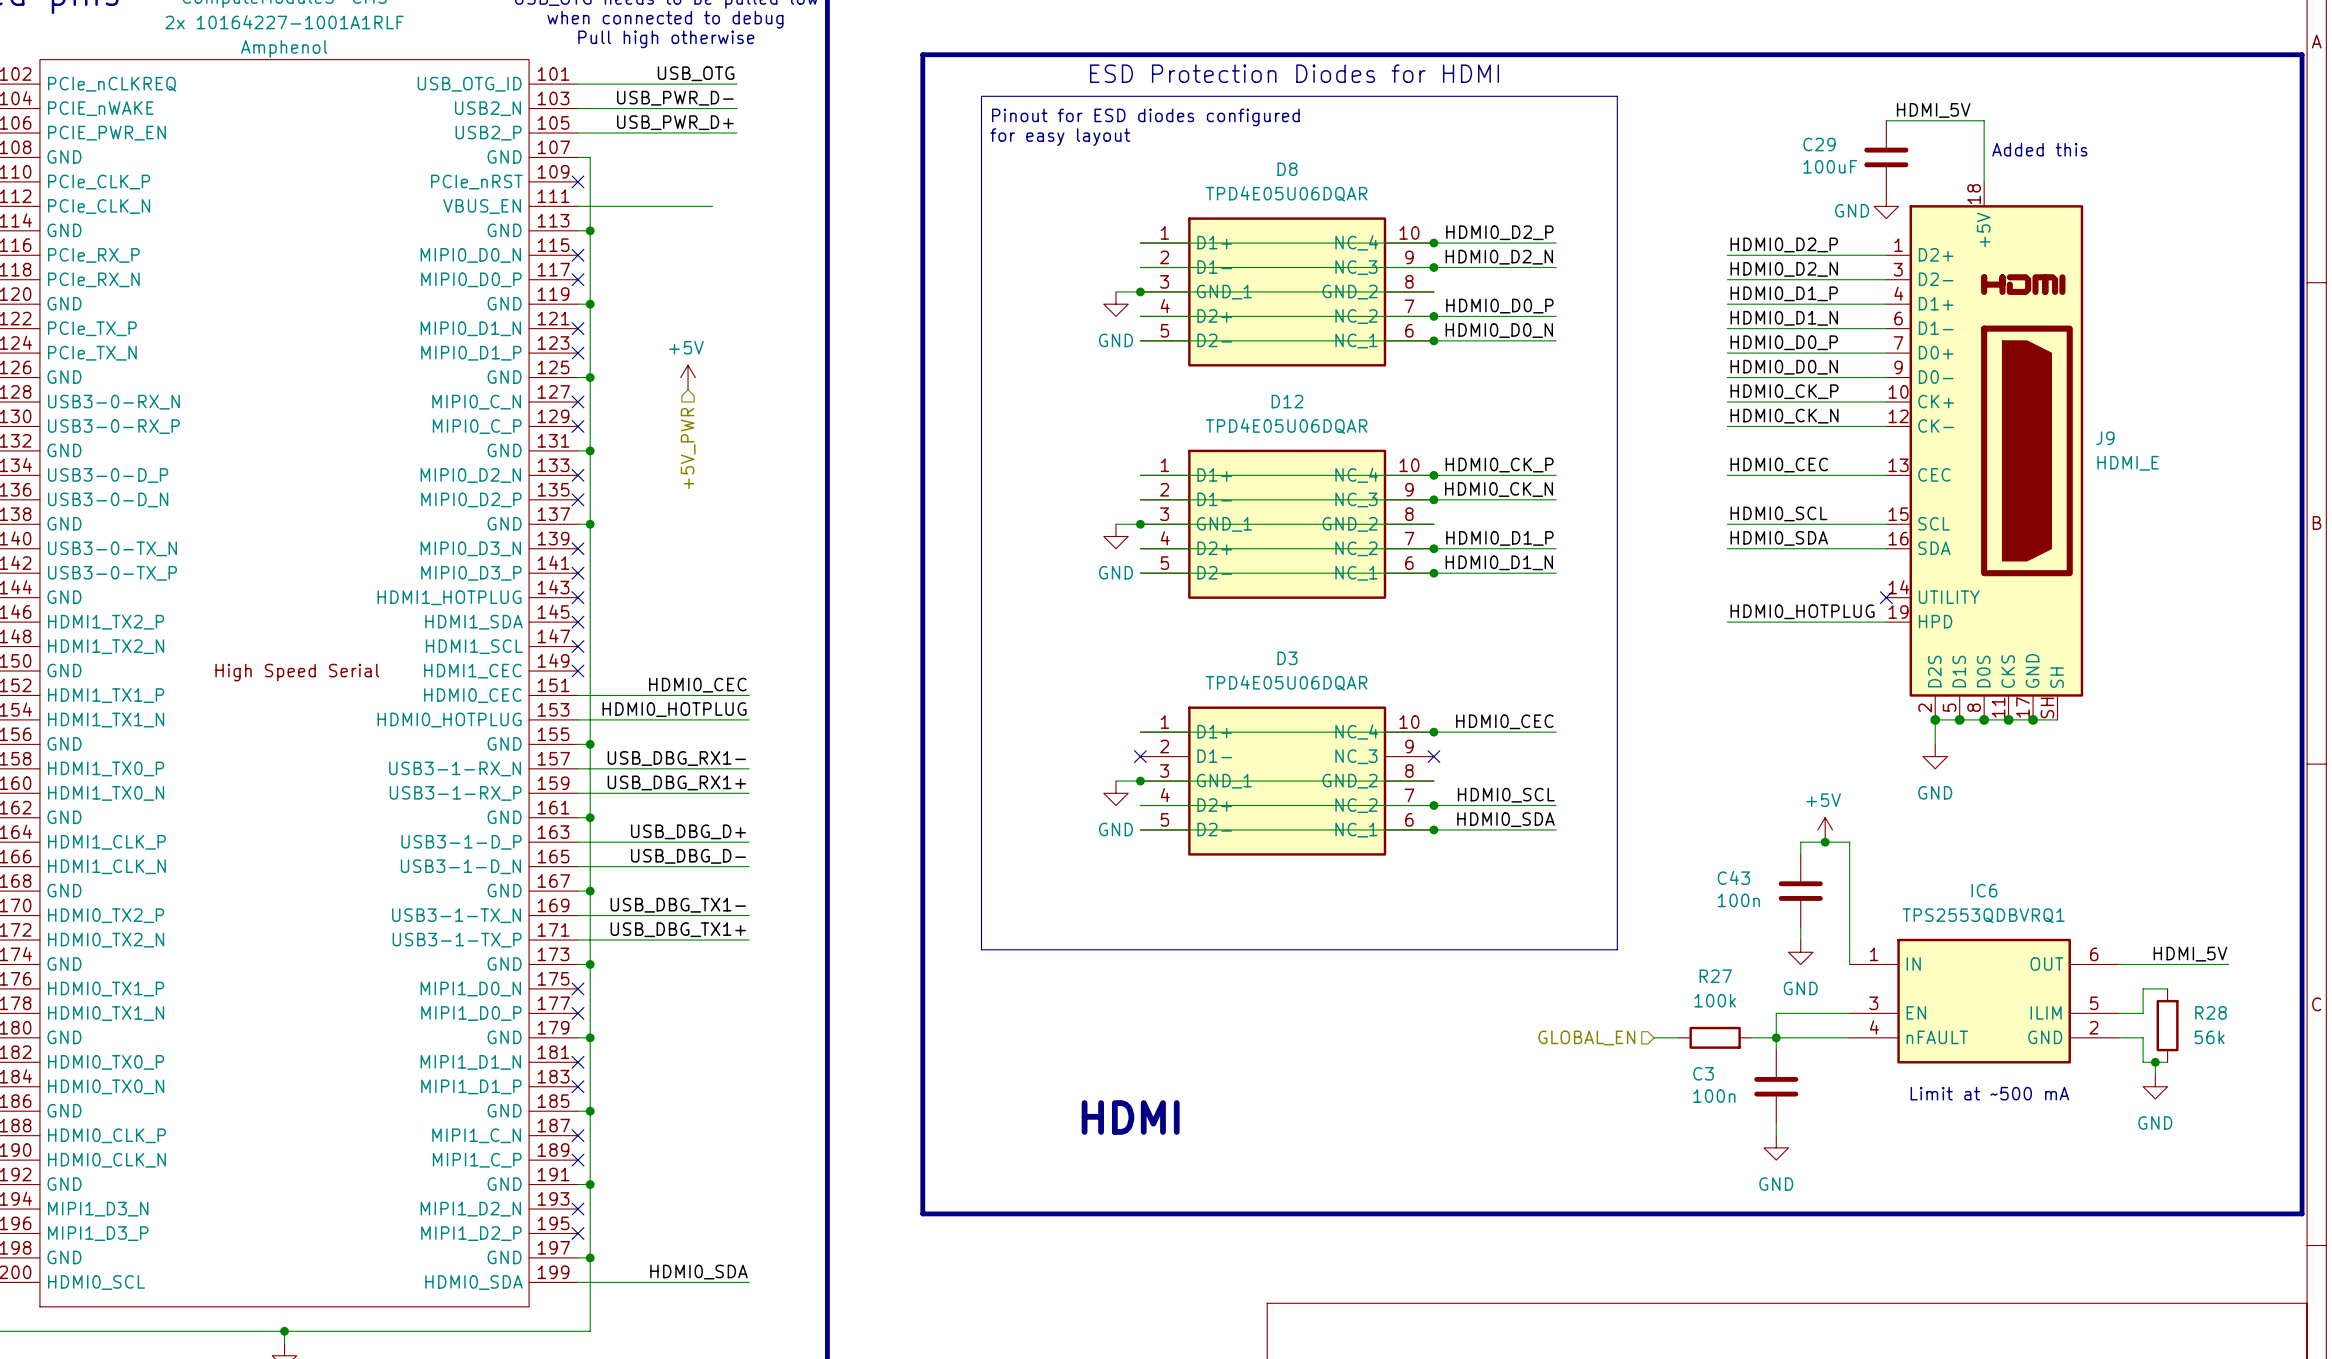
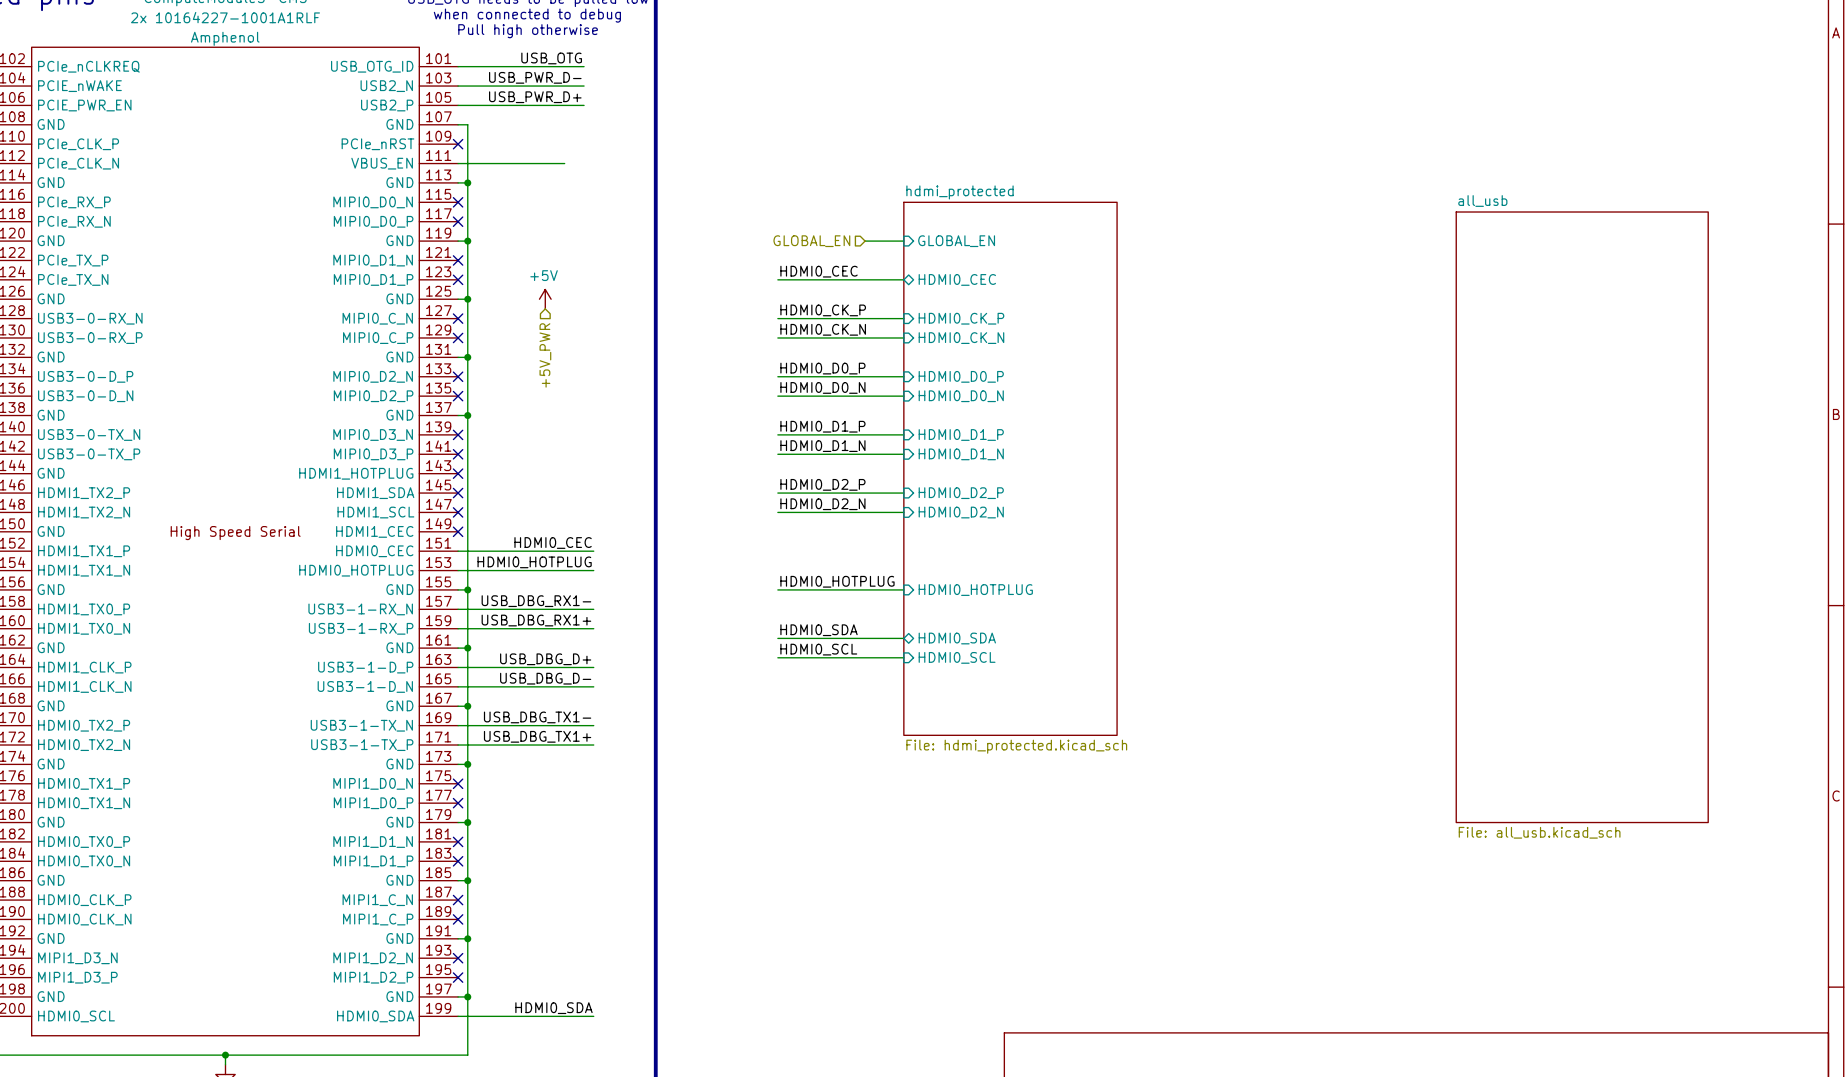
line: (922, 54) (2302, 54) (2302, 1213) (922, 1213) (922, 54) -> none
text: ESD Protection Diodes for HDMI (1294, 73) -> none
line: (981, 96) (1617, 96) (1617, 949) (981, 949) (981, 96) -> none
label: HDMI_5V (1933, 110) -> none
text: Pinout for ESD diodes configured (1145, 117) -> none
wire: (1886, 120) (1984, 120) (1984, 181) -> none
text: for easy layout (1060, 137) -> none
text: Added this (2039, 149) -> none
C29: 100uF (1886, 157) -> none
power symbol: GND (1886, 206) -> none
label: HDMI0_D2_P (1499, 232) -> none
wire: (1140, 243) (1556, 243) -> none
junction: (1433, 243) -> none
label: HDMI0_D2_P (1784, 244) -> none
wire: (1727, 255) (1886, 255) -> none
label: HDMI0_D2_N (1499, 257) -> none
wire: (1140, 267) (1556, 267) -> none
junction: (1433, 267) -> none
label: HDMI0_D2_N (1784, 269) -> none
wire: (1727, 279) (1886, 279) -> none
wire: (1115, 291) (1433, 291) -> none
junction: (1140, 291) -> none
D8: TPD4E05U06DQAR (1287, 291) -> none
label: HDMI0_D1_P (1784, 293) -> none
hierarchical label: none -> GLOBAL_EN (811, 241)
wire: none -> (865, 241) (903, 241)
power symbol: GND (1115, 304) -> none
sheet pin: none -> GLOBAL_EN (956, 241)
wire: (1727, 304) (1886, 304) -> none
label: HDMI0_D0_P (1499, 306) -> none
wire: (1140, 316) (1556, 316) -> none
junction: (1433, 316) -> none
label: HDMI0_D1_N (1784, 318) -> none
wire: (1727, 328) (1886, 328) -> none
label: HDMI0_D0_N (1499, 330) -> none
wire: (1140, 340) (1556, 340) -> none
junction: (1433, 340) -> none
label: none -> HDMI0_CEC (819, 271)
label: HDMI0_D0_P (1784, 342) -> none
wire: none -> (777, 279) (903, 279)
sheet pin: none -> HDMI0_CEC (957, 279)
wire: (1727, 353) (1886, 353) -> none
label: HDMI0_D0_N (1784, 367) -> none
wire: (1727, 377) (1886, 377) -> none
label: none -> HDMI0_CK_P (823, 310)
label: HDMI0_CK_P (1784, 391) -> none
wire: none -> (777, 318) (903, 318)
sheet pin: none -> HDMI0_CK_P (961, 318)
wire: (1727, 402) (1886, 402) -> none
label: none -> HDMI0_CK_N (823, 329)
label: HDMI0_CK_N (1784, 416) -> none
wire: none -> (777, 337) (903, 337)
sheet pin: none -> HDMI0_CK_N (961, 338)
wire: (1727, 426) (1886, 426) -> none
J9: HDMI_E (1984, 450) -> none
label: none -> HDMI0_D0_P (822, 368)
label: HDMI0_CK_P (1499, 465) -> none
label: HDMI0_CEC (1779, 465) -> none
wire: (1140, 475) (1556, 475) -> (903, 376) (777, 376)
sheet pin: none -> HDMI0_D0_P (961, 376)
junction: (1433, 475) -> none
wire: (1727, 475) (1886, 475) -> none
label: none -> HDMI0_D0_N (822, 387)
label: HDMI0_CK_N (1499, 489) -> none
wire: (1140, 499) (1556, 499) -> (903, 396) (777, 396)
sheet pin: none -> HDMI0_D0_N (961, 396)
junction: (1433, 499) -> none
label: HDMI0_SCL (1778, 513) -> none
wire: (1115, 524) (1433, 524) -> none
junction: (1140, 524) -> none
D12: TPD4E05U06DQAR (1287, 524) -> none
wire: (1727, 524) (1886, 524) -> none
power symbol: GND (1115, 536) -> none
label: none -> HDMI0_D1_P (822, 426)
label: HDMI0_D1_P (1499, 538) -> none
label: HDMI0_SDA (1779, 538) -> none
wire: (1140, 548) (1556, 548) -> (903, 434) (777, 434)
sheet pin: none -> HDMI0_D1_P (961, 434)
junction: (1433, 548) -> none
wire: (1727, 548) (1886, 548) -> none
label: none -> HDMI0_D1_N (822, 446)
label: HDMI0_D1_N (1499, 562) -> none
wire: (1140, 573) (1556, 573) -> (903, 454) (777, 454)
sheet pin: none -> HDMI0_D1_N (961, 454)
junction: (1433, 573) -> none
sheet hdmi_protected: none -> File: hdmi_protected.kicad_sch (1010, 468)
no-connect mark: (1886, 597) -> none
label: none -> HDMI0_D2_P (822, 484)
label: HDMI0_HOTPLUG (1802, 611) -> none
wire: none -> (777, 493) (903, 493)
sheet pin: none -> HDMI0_D2_P (961, 493)
wire: (1727, 622) (1886, 622) -> none
label: none -> HDMI0_D2_N (822, 504)
wire: none -> (777, 512) (903, 512)
sheet pin: none -> HDMI0_D2_N (961, 512)
sheet all_usb: none -> File: all_usb.kicad_sch (1582, 517)
junction: (1935, 719) -> none
junction: (1959, 719) -> none
junction: (1984, 719) -> none
junction: (2008, 719) -> none
junction: (2033, 719) -> none
wire: (2057, 719) (1935, 719) (1935, 744) -> none
label: HDMI0_CEC (1504, 721) -> none
wire: (1140, 732) (1556, 732) -> none
junction: (1433, 732) -> none
label: none -> HDMI0_HOTPLUG (837, 581)
wire: none -> (777, 589) (903, 589)
sheet pin: none -> HDMI0_HOTPLUG (975, 590)
no-connect mark: (1140, 756) -> none
no-connect mark: (1433, 756) -> none
power symbol: GND (1935, 756) -> none
wire: (1115, 781) (1433, 781) -> none
junction: (1140, 781) -> none
D3: TPD4E05U06DQAR (1287, 781) -> none
power symbol: GND (1115, 793) -> none
label: none -> HDMI0_SDA (819, 630)
label: HDMI0_SCL (1506, 795) -> none
wire: (1140, 805) (1556, 805) -> (903, 638) (777, 638)
sheet pin: none -> HDMI0_SDA (957, 638)
junction: (1433, 805) -> none
label: none -> HDMI0_SCL (818, 649)
label: HDMI0_SDA (1506, 819) -> none
wire: (1140, 829) (1556, 829) -> (903, 657) (777, 657)
junction: (1433, 829) -> none
power symbol: +5V (1825, 829) -> none
sheet pin: none -> HDMI0_SCL (957, 657)
junction: (1825, 842) -> none
wire: (1800, 854) (1800, 842) (1849, 842) (1849, 964) -> none
C43: 100n (1800, 891) -> none
wire: (1800, 927) (1800, 940) -> none
power symbol: GND (1800, 952) -> none
label: HDMI_5V (2190, 954) -> none
wire: (2118, 964) (2228, 964) -> none
wire: (2167, 988) (2143, 988) (2143, 1013) (2118, 1013) -> none
IC6: TPS2553QDBVRQ1 (1984, 1001) -> none
wire: (1849, 1013) (1776, 1013) (1776, 1050) -> none
R28: 56k (2167, 1025) -> none
hierarchical label: GLOBAL_EN (1586, 1037) -> none
wire: (1654, 1037) (1678, 1037) -> none
R27: 100k (1715, 1037) -> none
wire: (1751, 1037) (1849, 1037) -> none
junction: (1776, 1037) -> none
wire: (2118, 1037) (2143, 1037) (2143, 1062) (2167, 1062) -> none
wire: (2155, 1062) (2155, 1074) -> none
junction: (2155, 1062) -> none
C3: 100n (1776, 1086) -> none
power symbol: GND (2155, 1086) -> none
text: Limit at ~500 mA (1989, 1093) -> none
text: HDMI (1130, 1117) -> none
wire: (1776, 1123) (1776, 1135) -> none
power symbol: GND (1776, 1147) -> none

